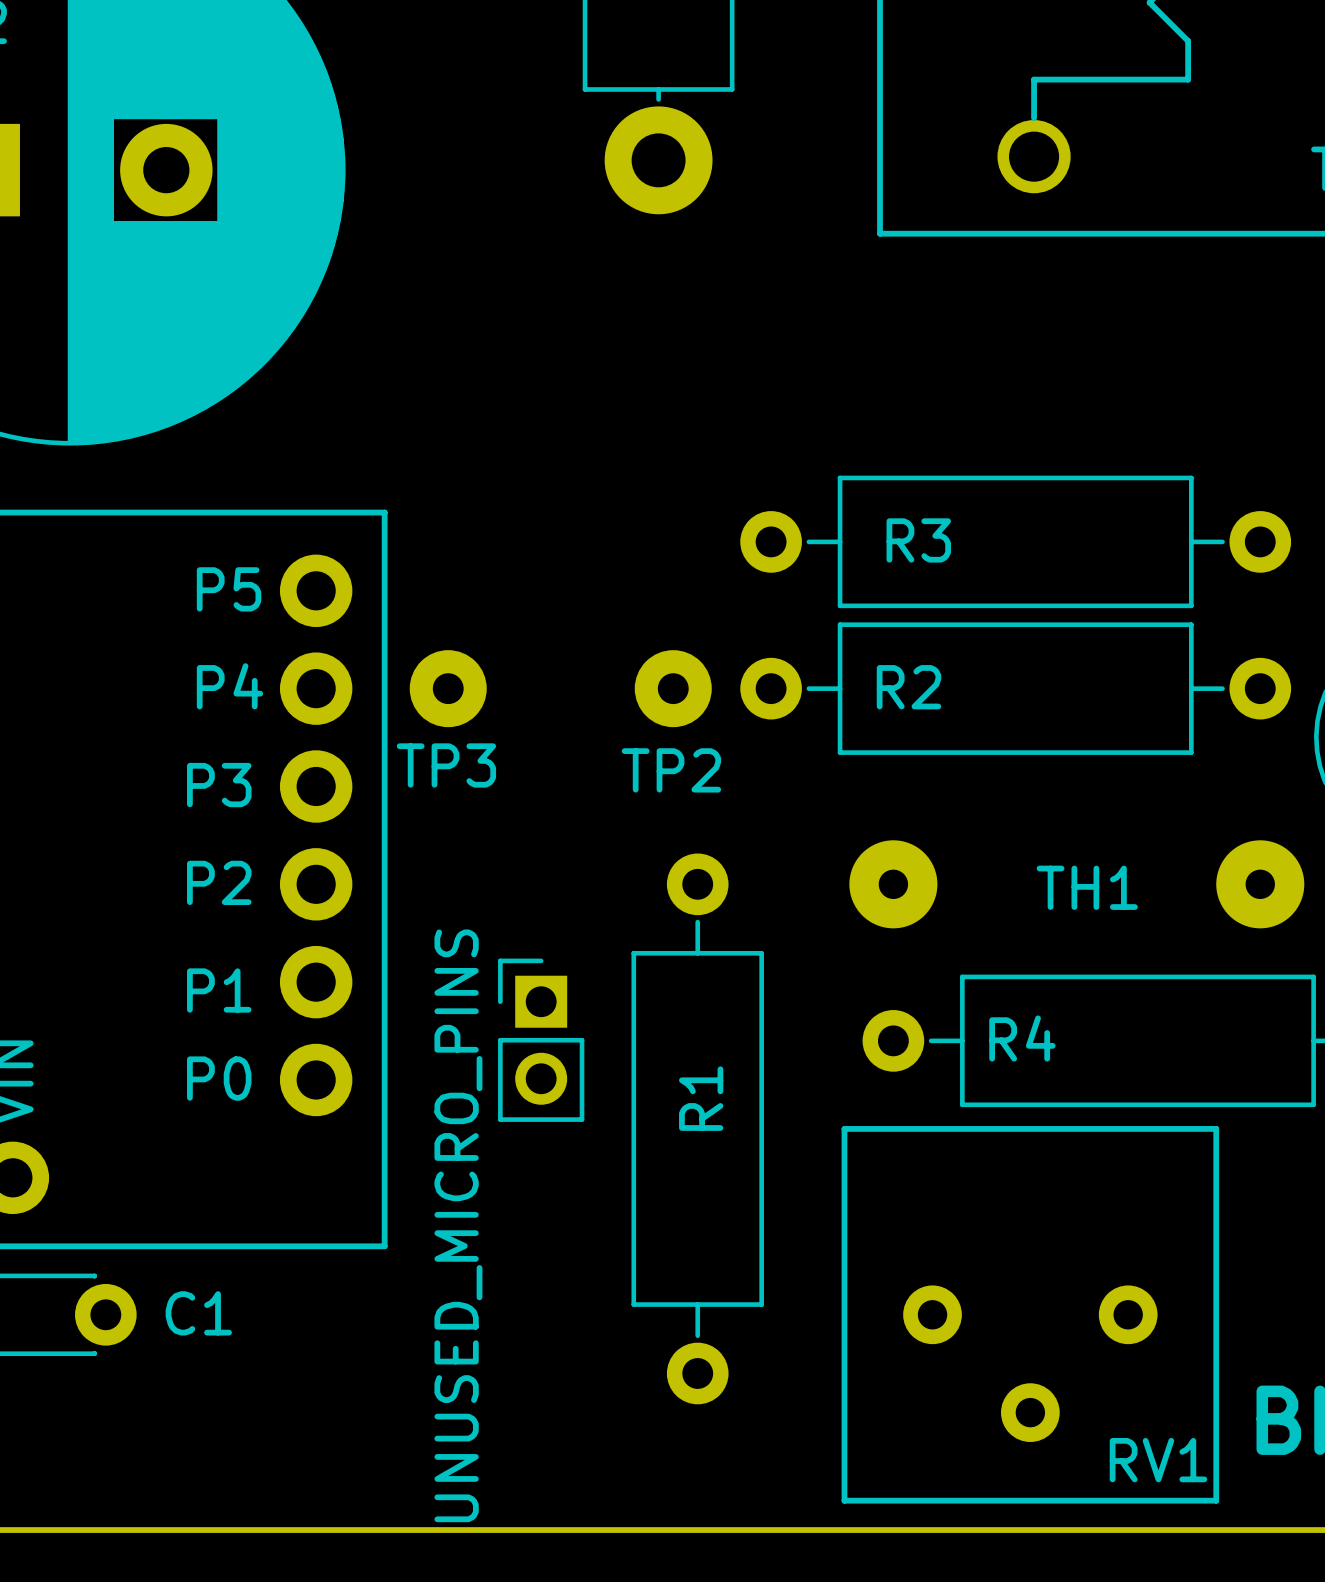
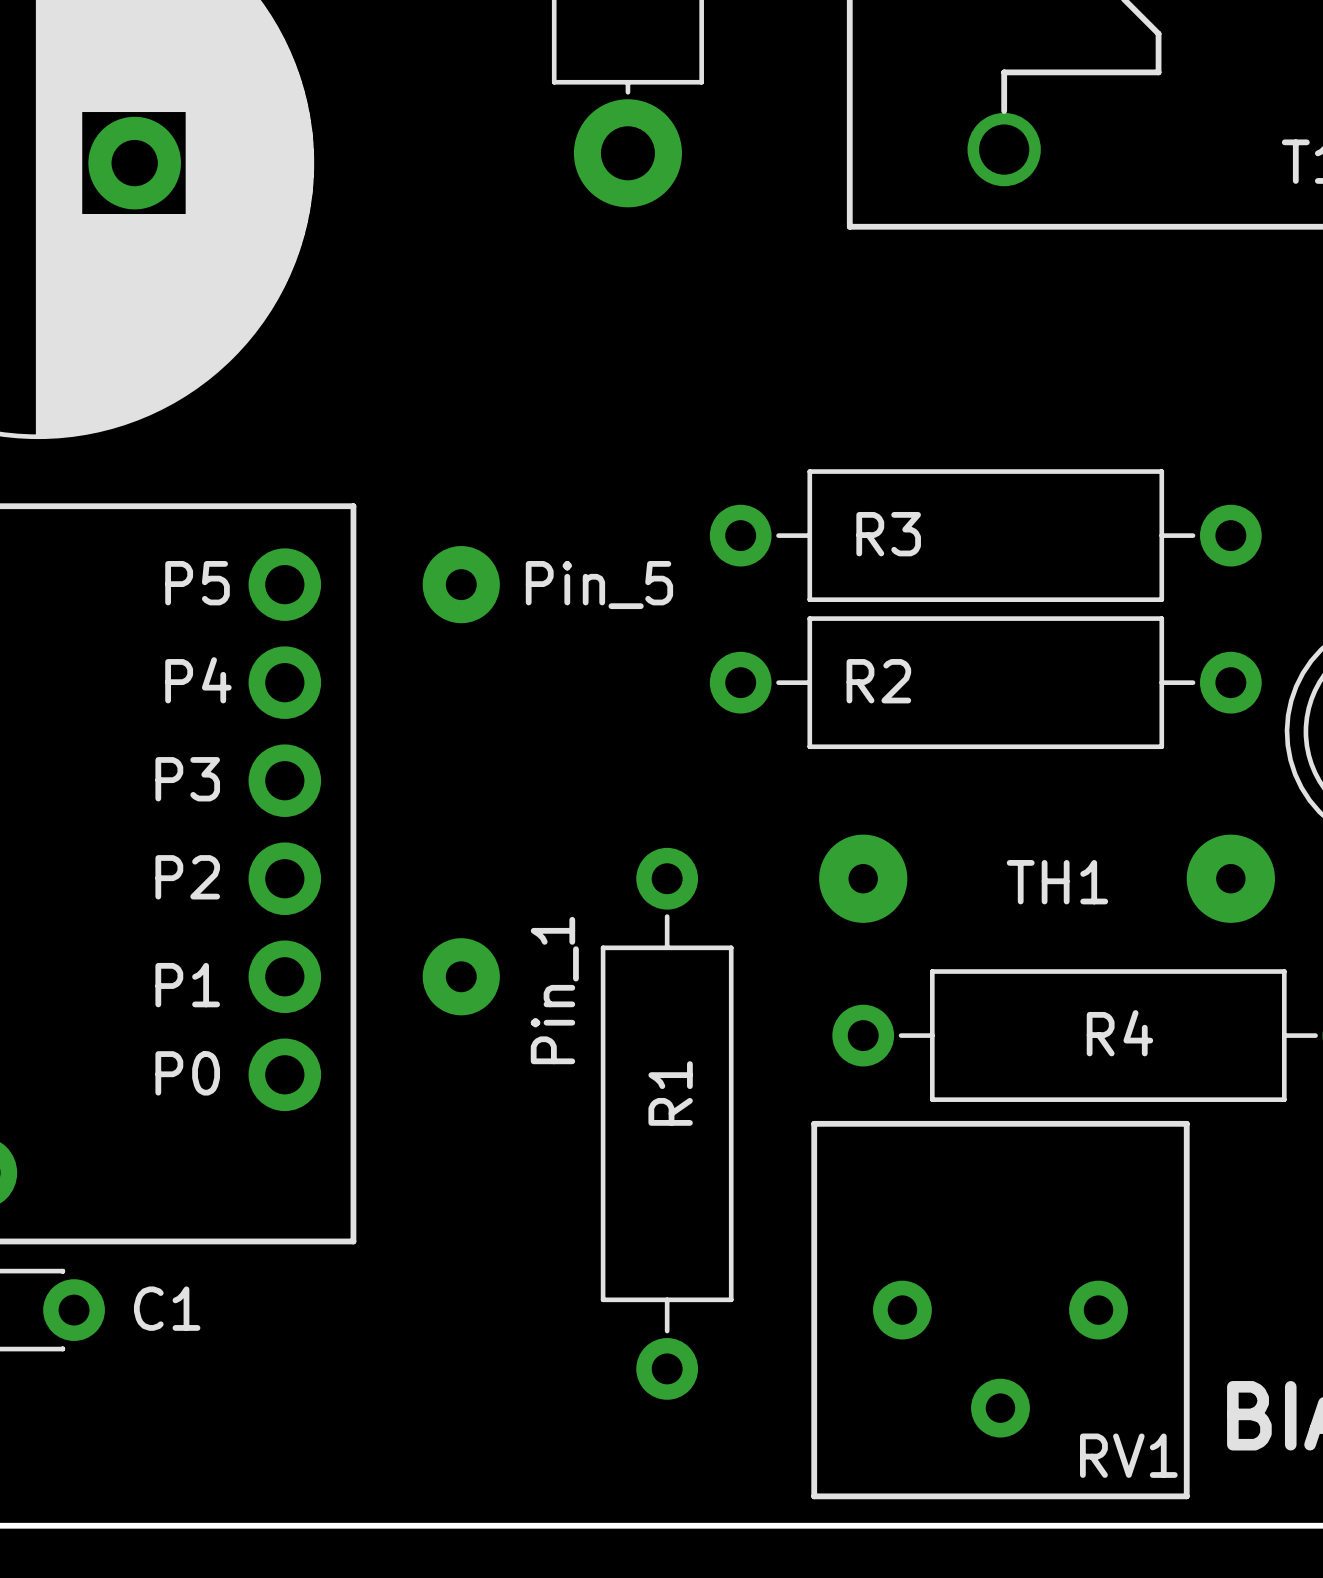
part: none -> Pin_5 (461, 584)
TP3: (448, 688) -> none
TP2: (673, 688) -> none
part: none -> Pin_1 (461, 976)
R4 name position: R4 (1022, 1038) -> R4 (1119, 1033)
part: UNUSED_MICRO_PINS (541, 1040) -> none

